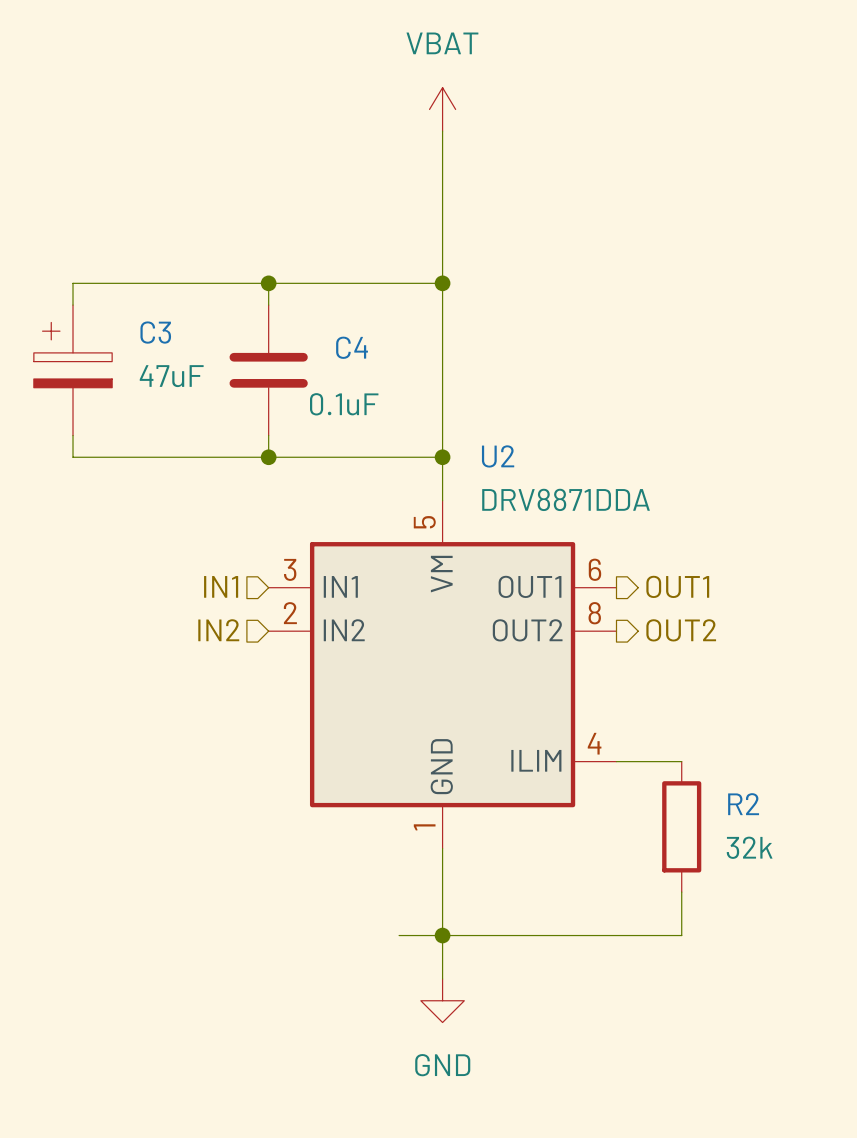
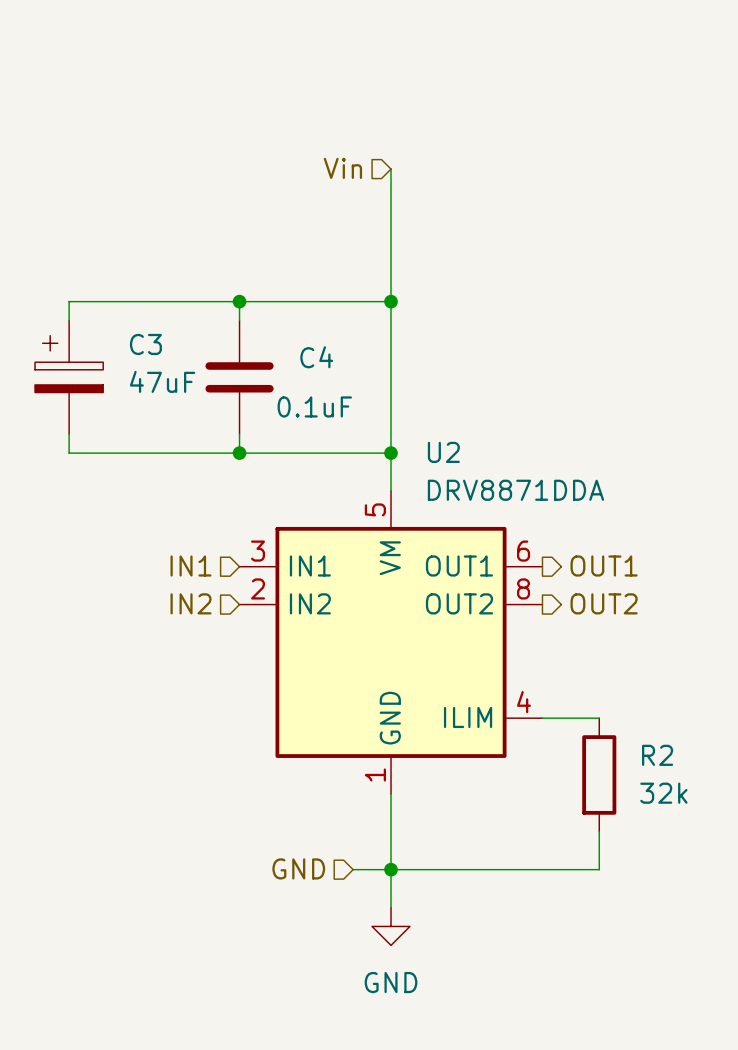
power symbol: VBAT (442, 109) -> none
hierarchical label: none -> Vin (342, 168)
hierarchical label: none -> GND (298, 868)

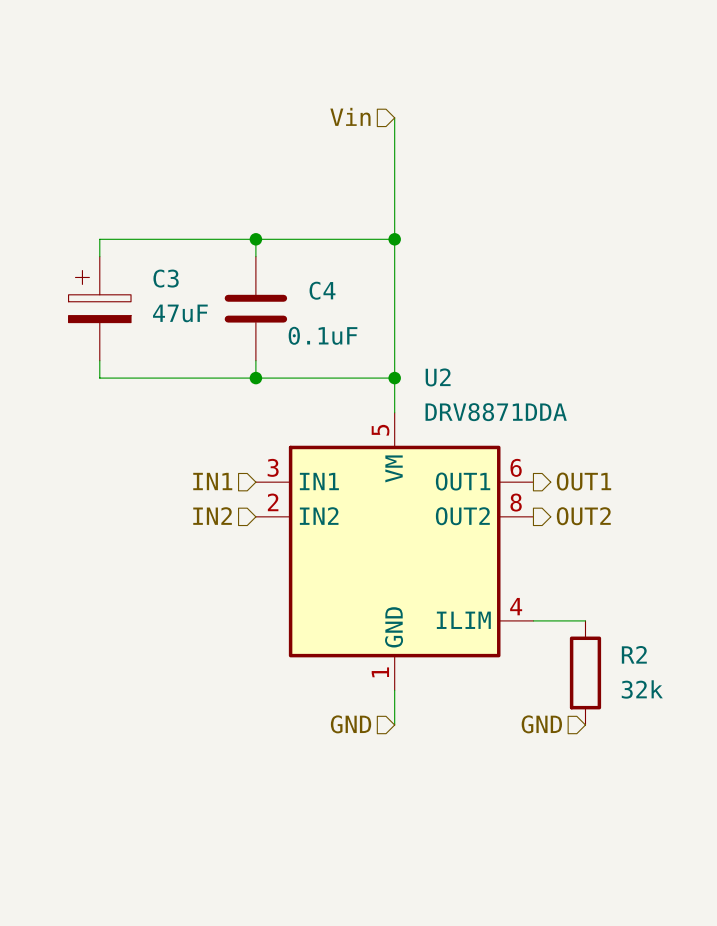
wire: (391, 831) (391, 907) -> none
hierarchical label: none -> GND (541, 724)
wire: (599, 831) (599, 869) (353, 869) -> none
hierarchical label position: GND (298, 868) -> GND (351, 724)
junction: (391, 869) -> none
power symbol: GND (391, 926) -> none

